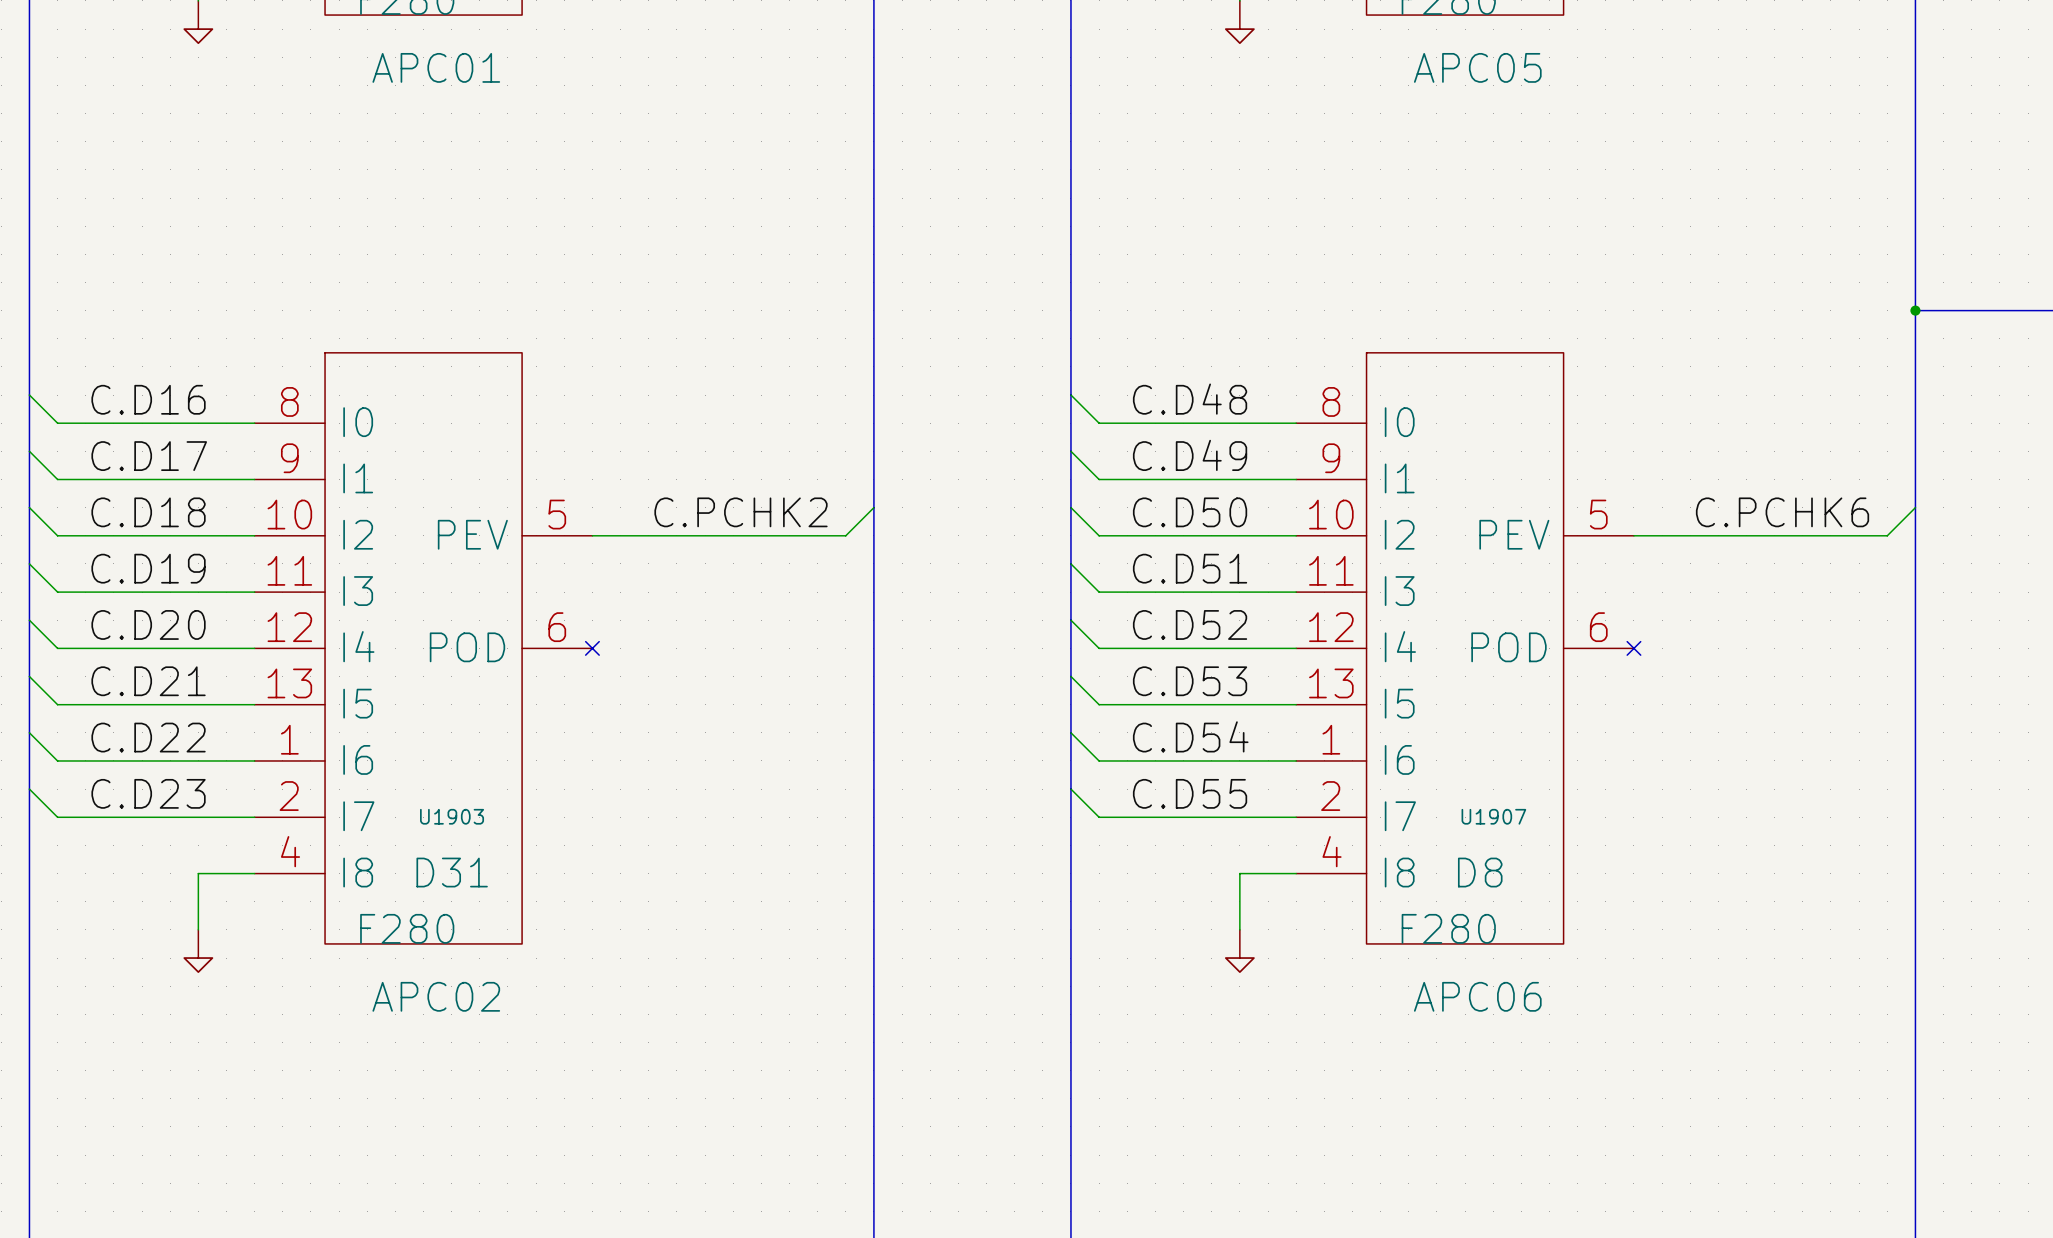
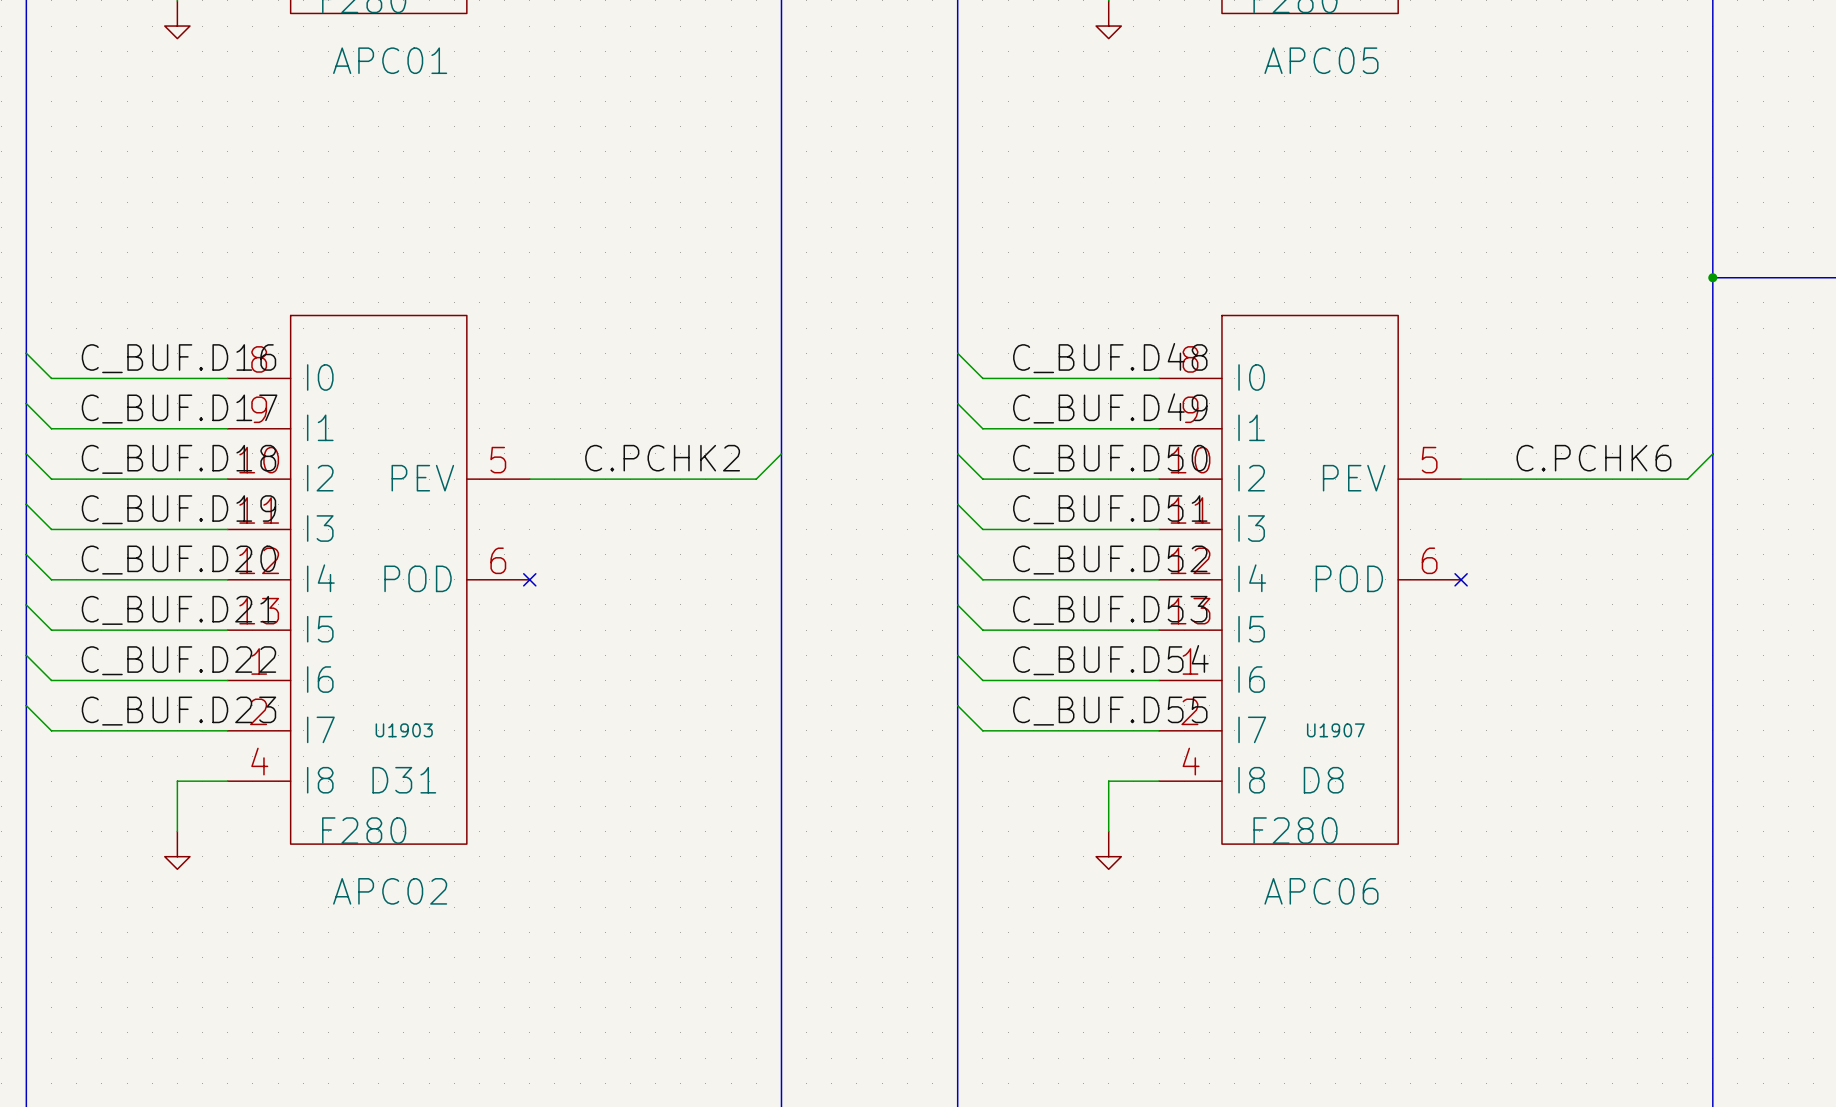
label: C.D16 (148, 399) -> C_BUF.D16 (178, 358)
label: C.D48 (1190, 399) -> C_BUF.D48 (1110, 358)
label: C.D49 (1190, 455) -> C_BUF.D49 (1110, 408)
label: C.D17 (149, 456) -> C_BUF.D17 (179, 409)
label: C.D18 (148, 512) -> C_BUF.D18 (178, 459)
label: C.D50 (1190, 512) -> C_BUF.D50 (1110, 459)
label: C.D19 (148, 568) -> C_BUF.D19 (178, 509)
label: C.D51 (1190, 568) -> C_BUF.D51 (1110, 509)
label: C.D20 (148, 624) -> C_BUF.D20 (178, 560)
label: C.D52 (1190, 624) -> C_BUF.D52 (1110, 560)
label: C.D21 (148, 681) -> C_BUF.D21 (178, 610)
label: C.D53 (1190, 681) -> C_BUF.D53 (1110, 610)
label: C.D54 (1190, 736) -> C_BUF.D54 (1110, 660)
label: C.D22 (148, 737) -> C_BUF.D22 (178, 660)
label: C.D23 (148, 793) -> C_BUF.D23 (178, 711)
label: C.D55 (1190, 793) -> C_BUF.D55 (1110, 711)

